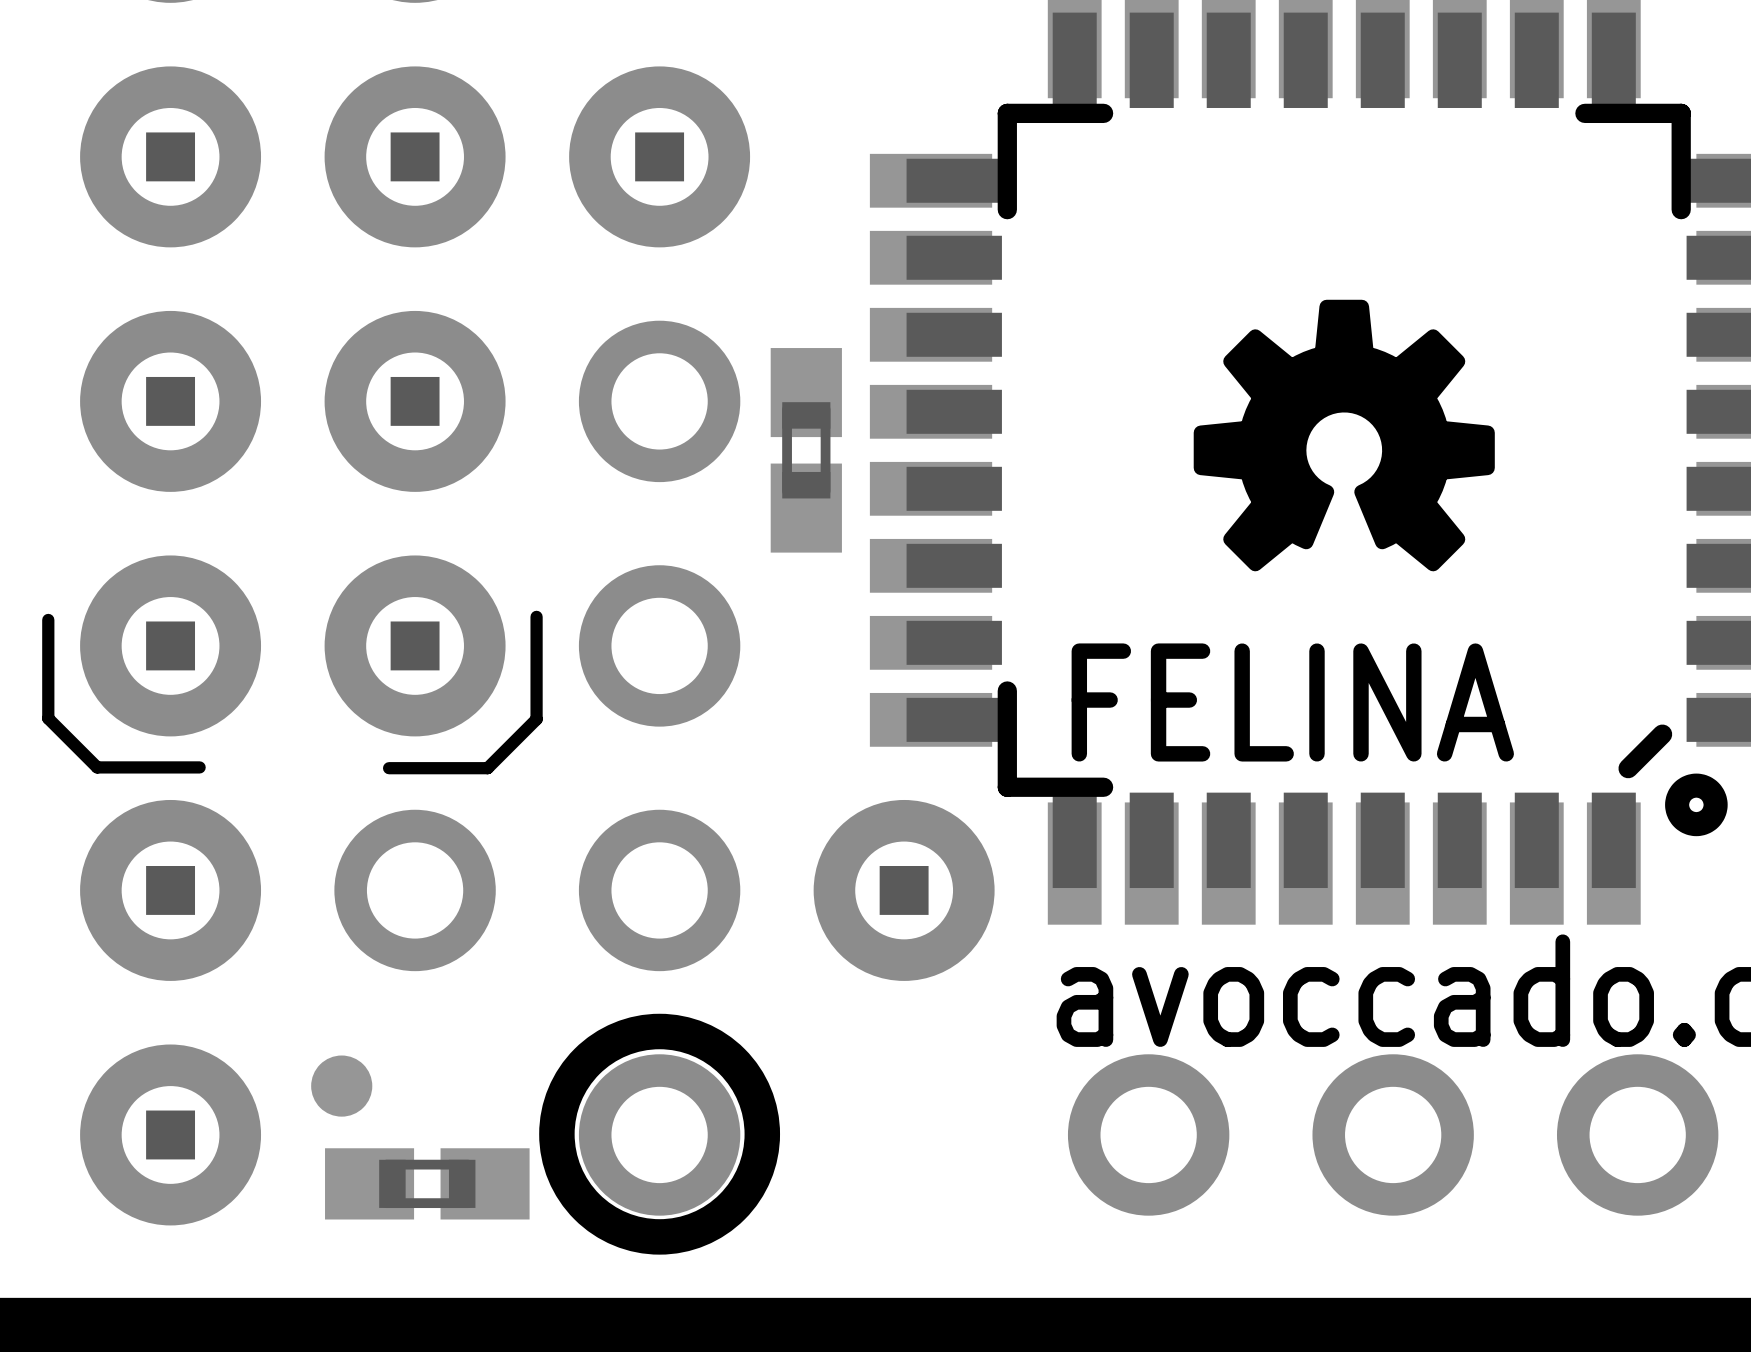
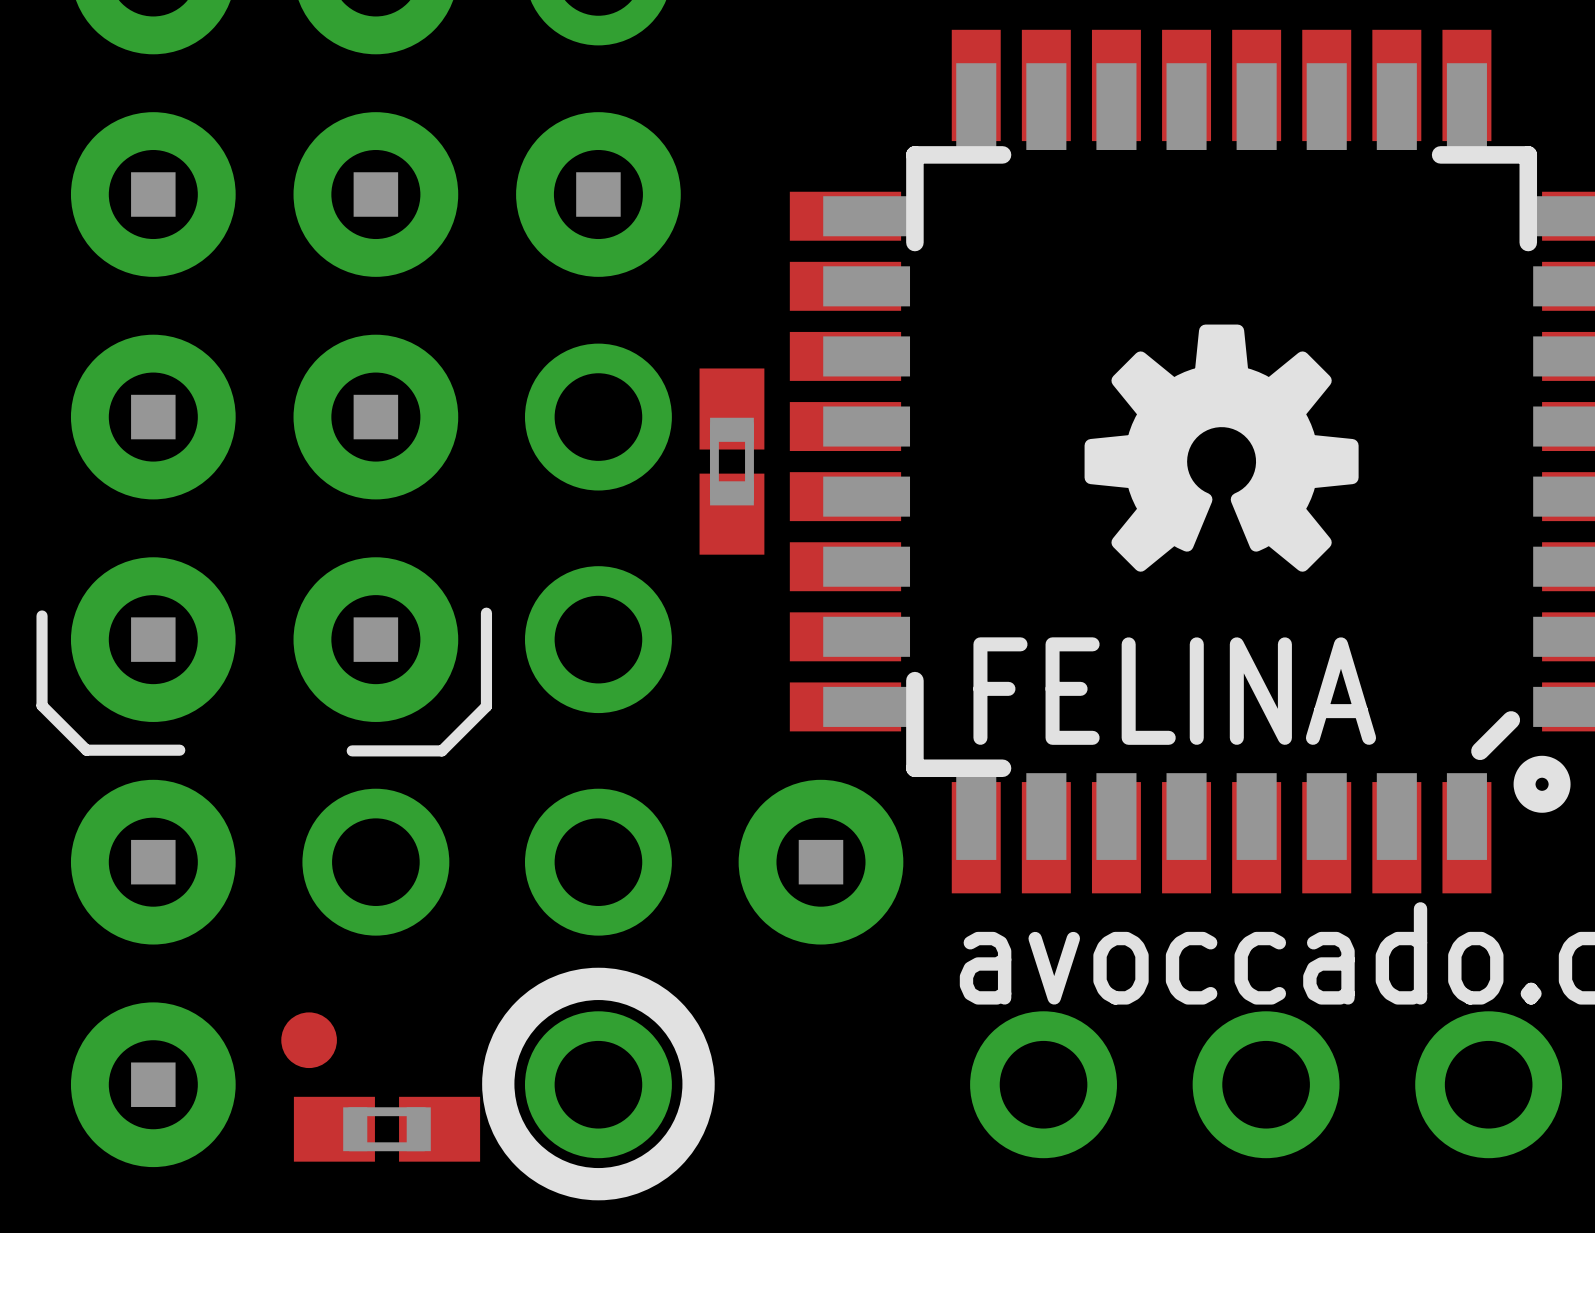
drawing shape: [539, 1013, 781, 1255] -> [482, 967, 715, 1201]

